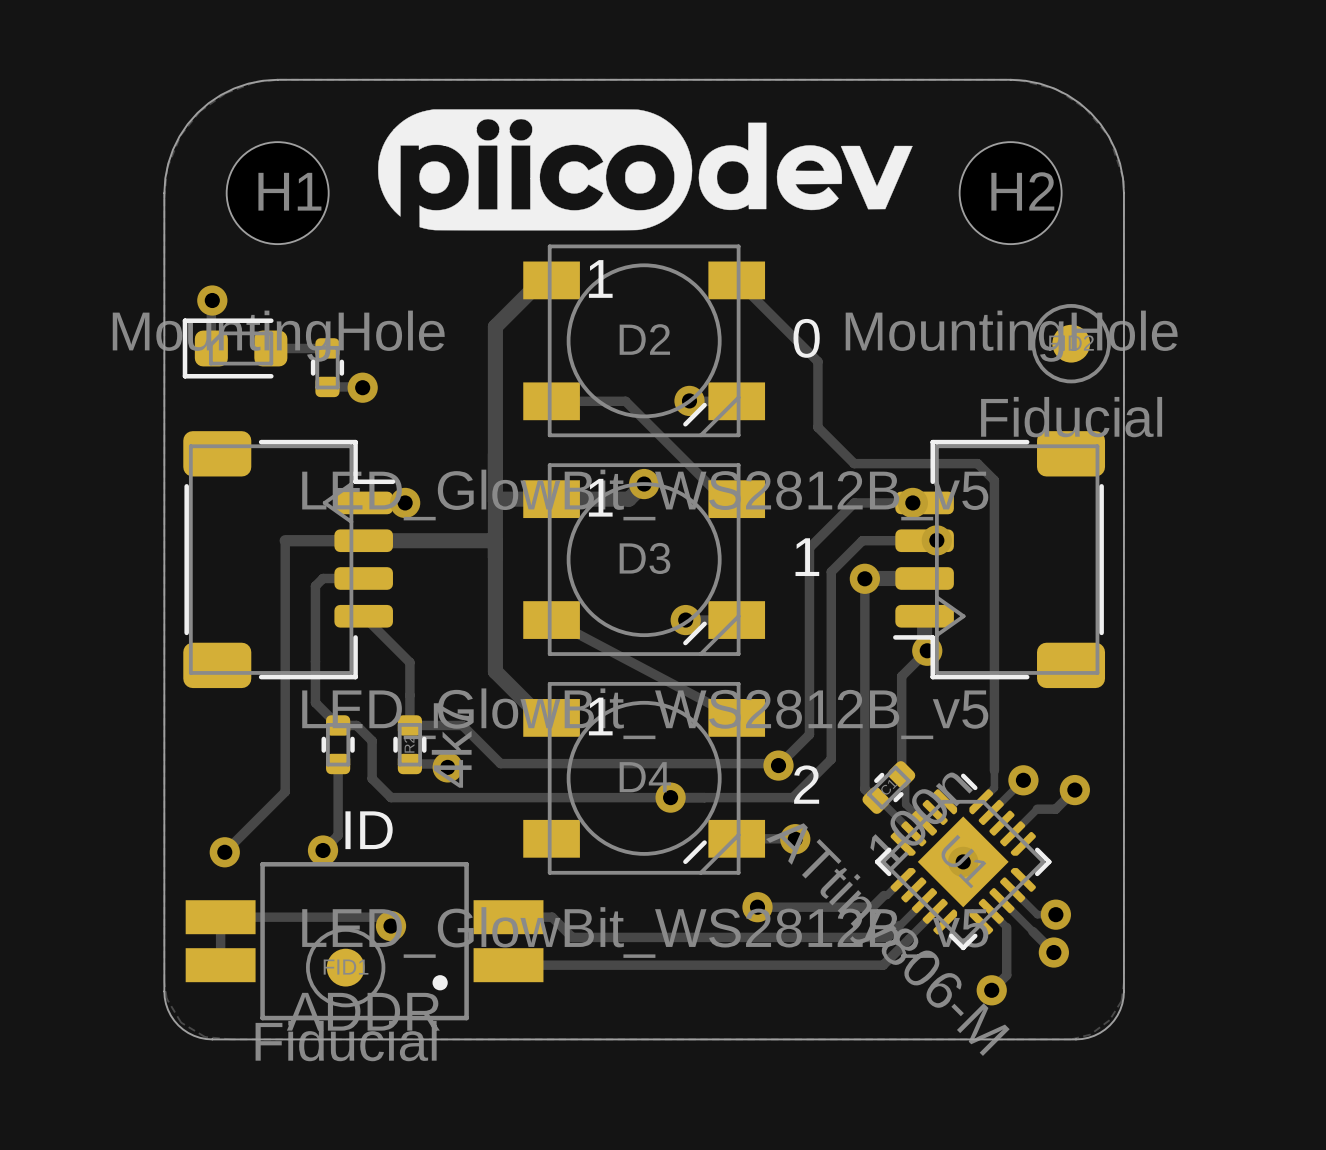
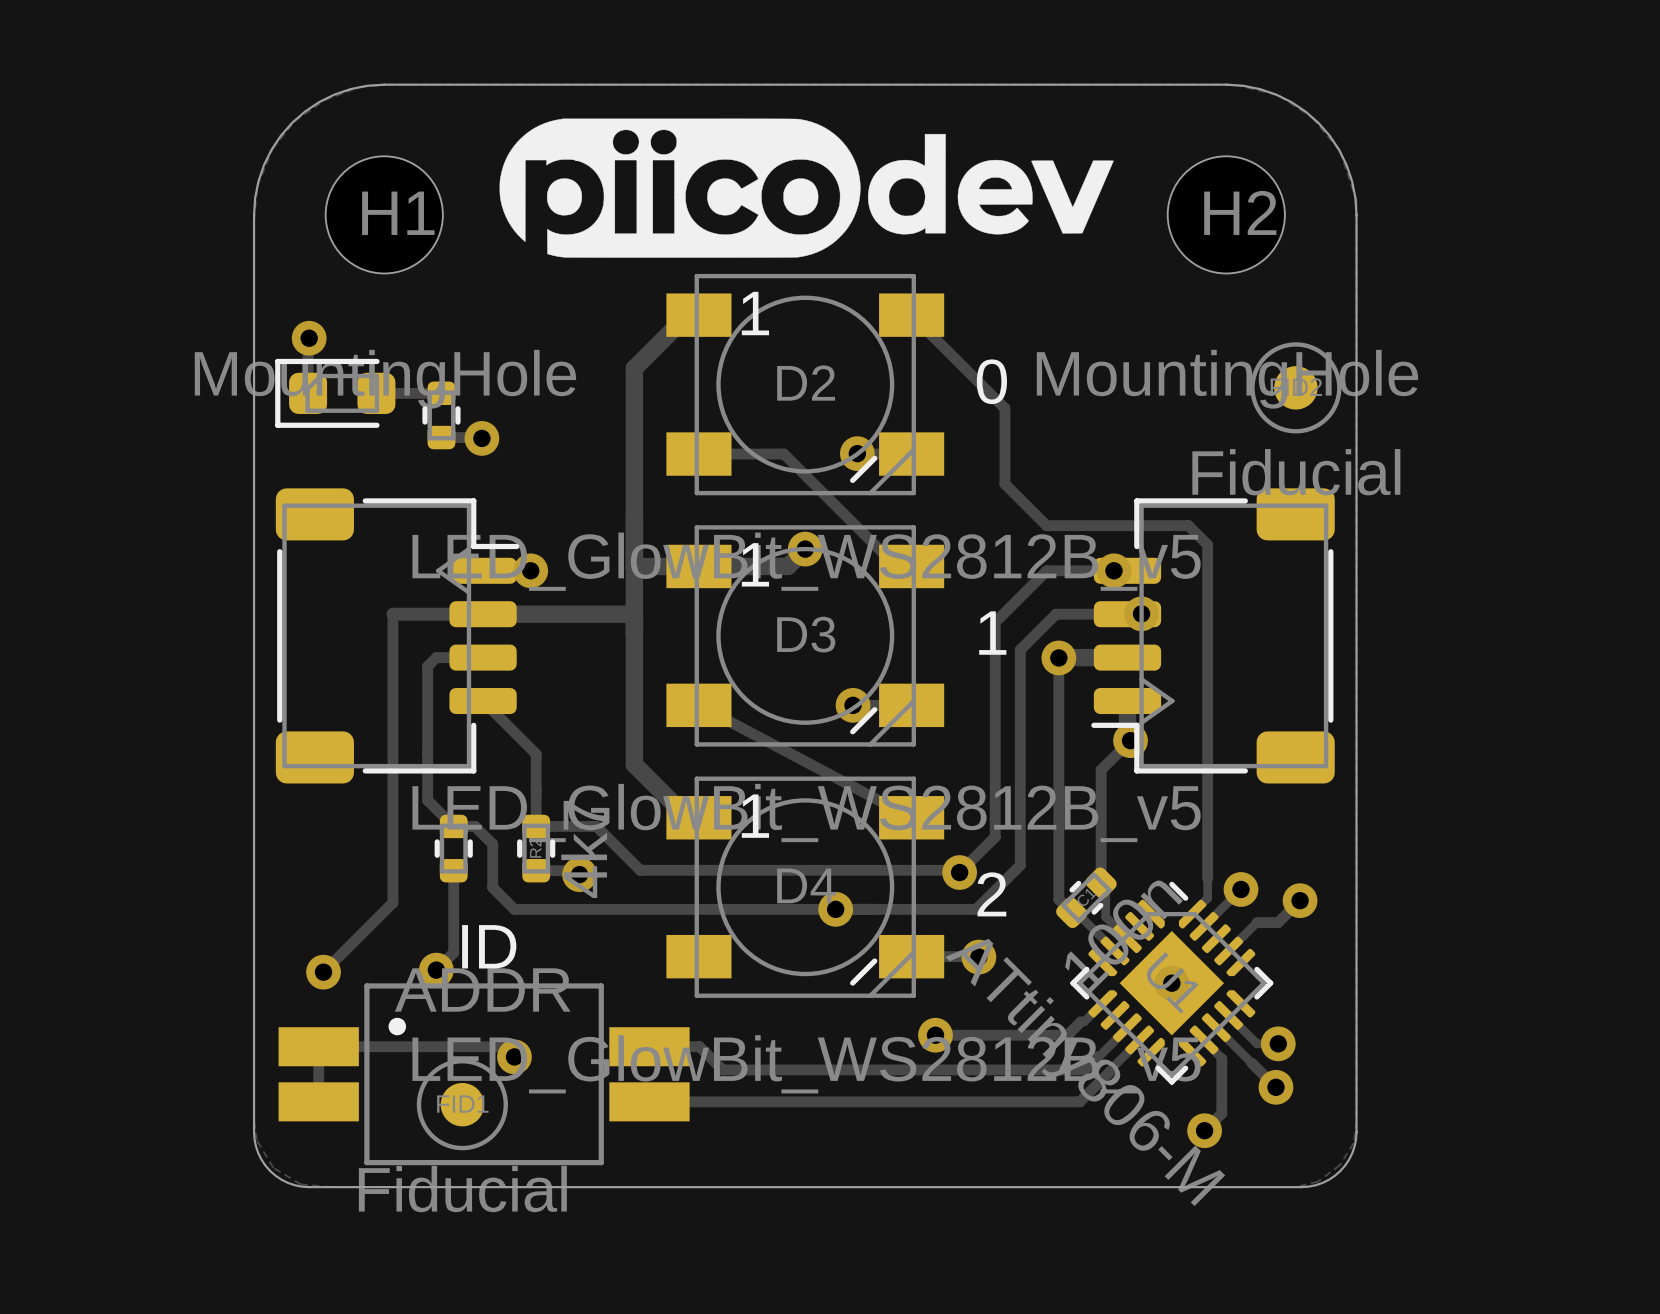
part rotation: 0° (364, 941) -> 180° (484, 1074)

